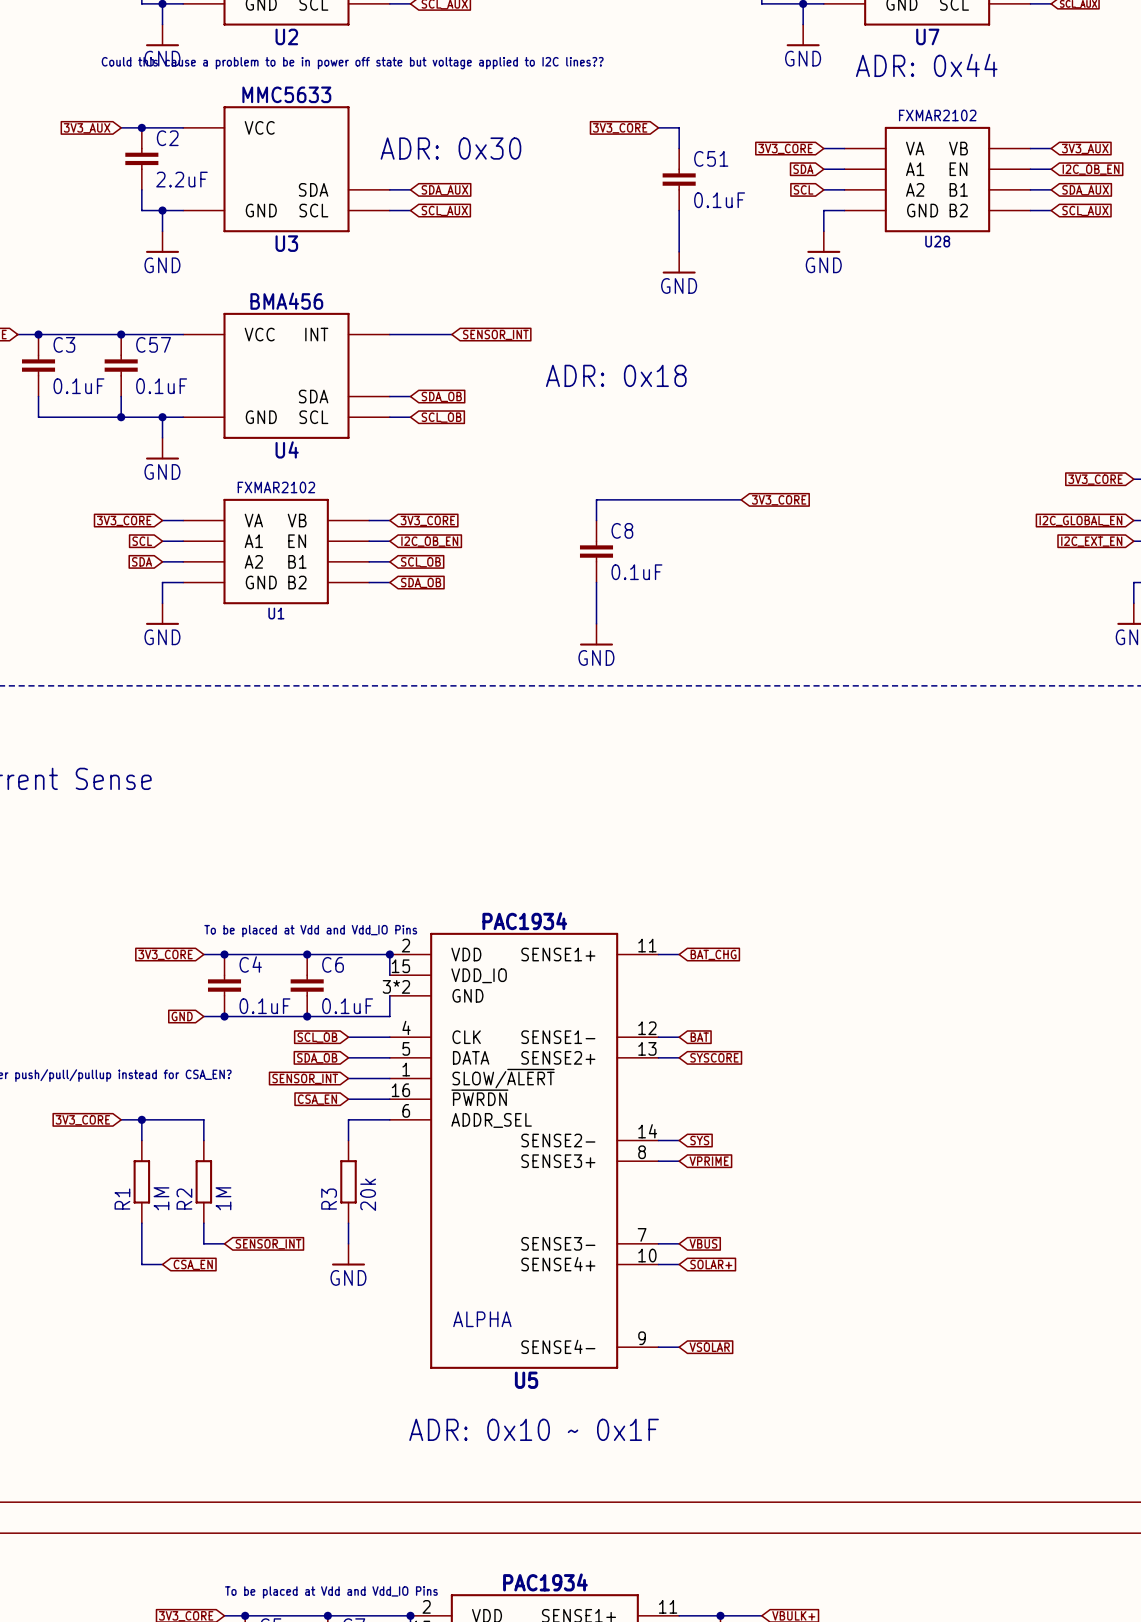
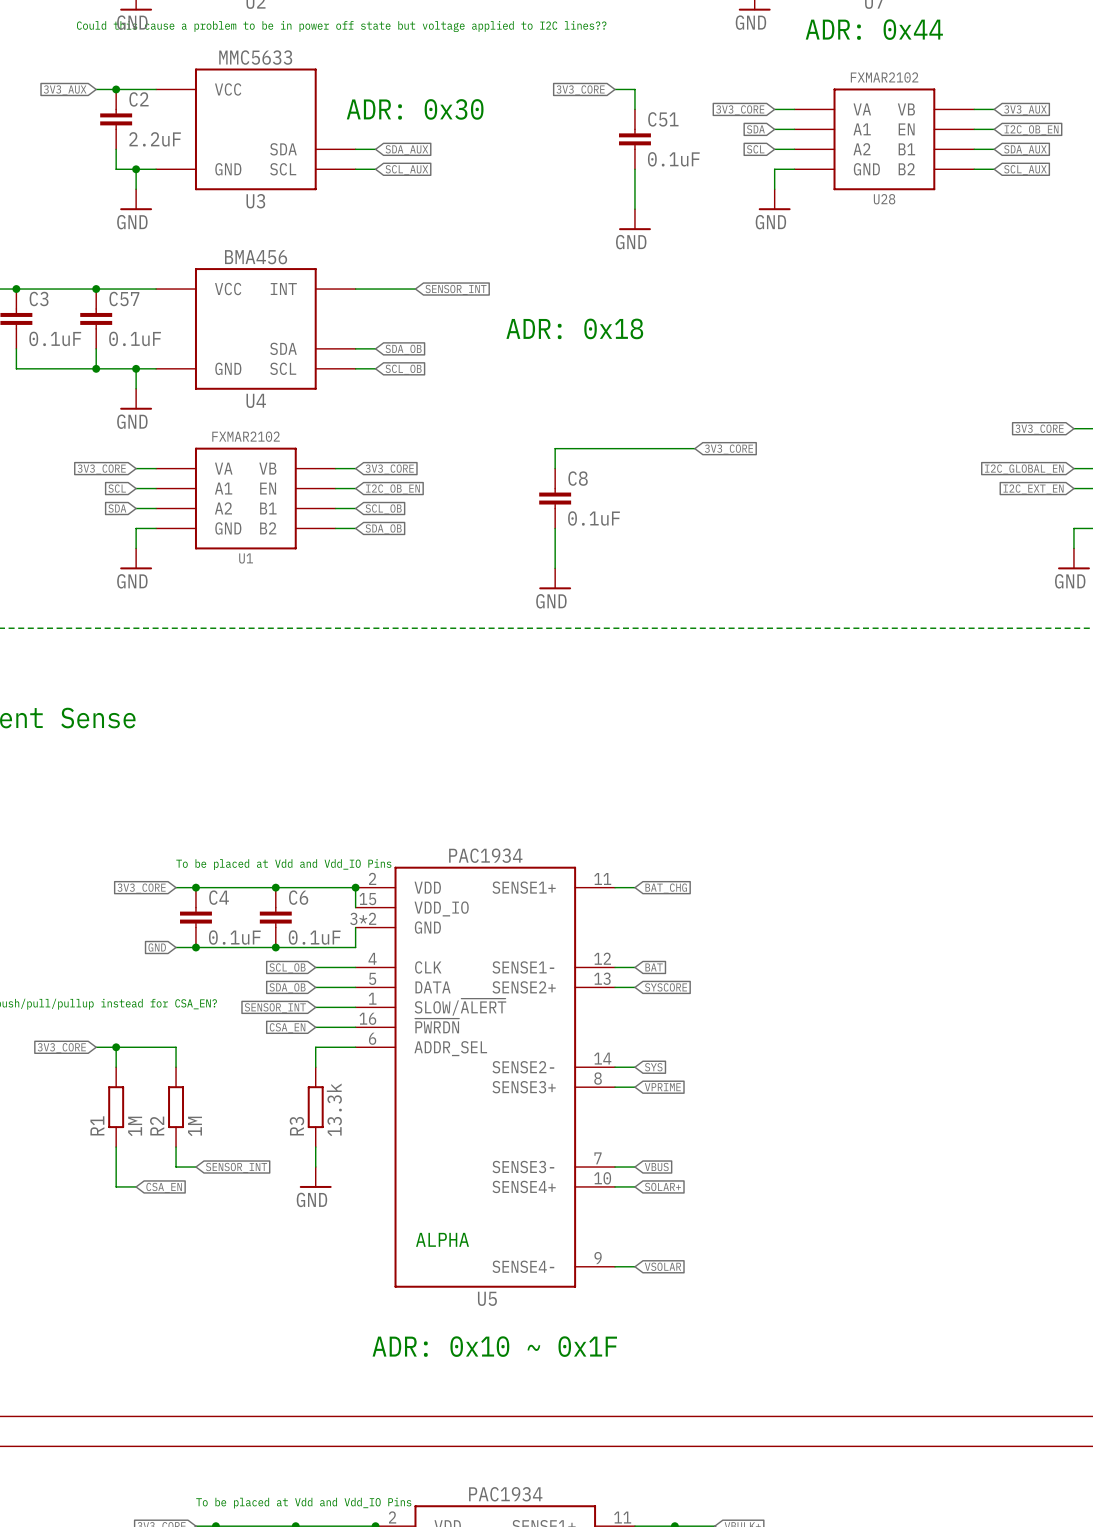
R3 value: 20k (368, 1194) -> 13.3k (334, 1109)

